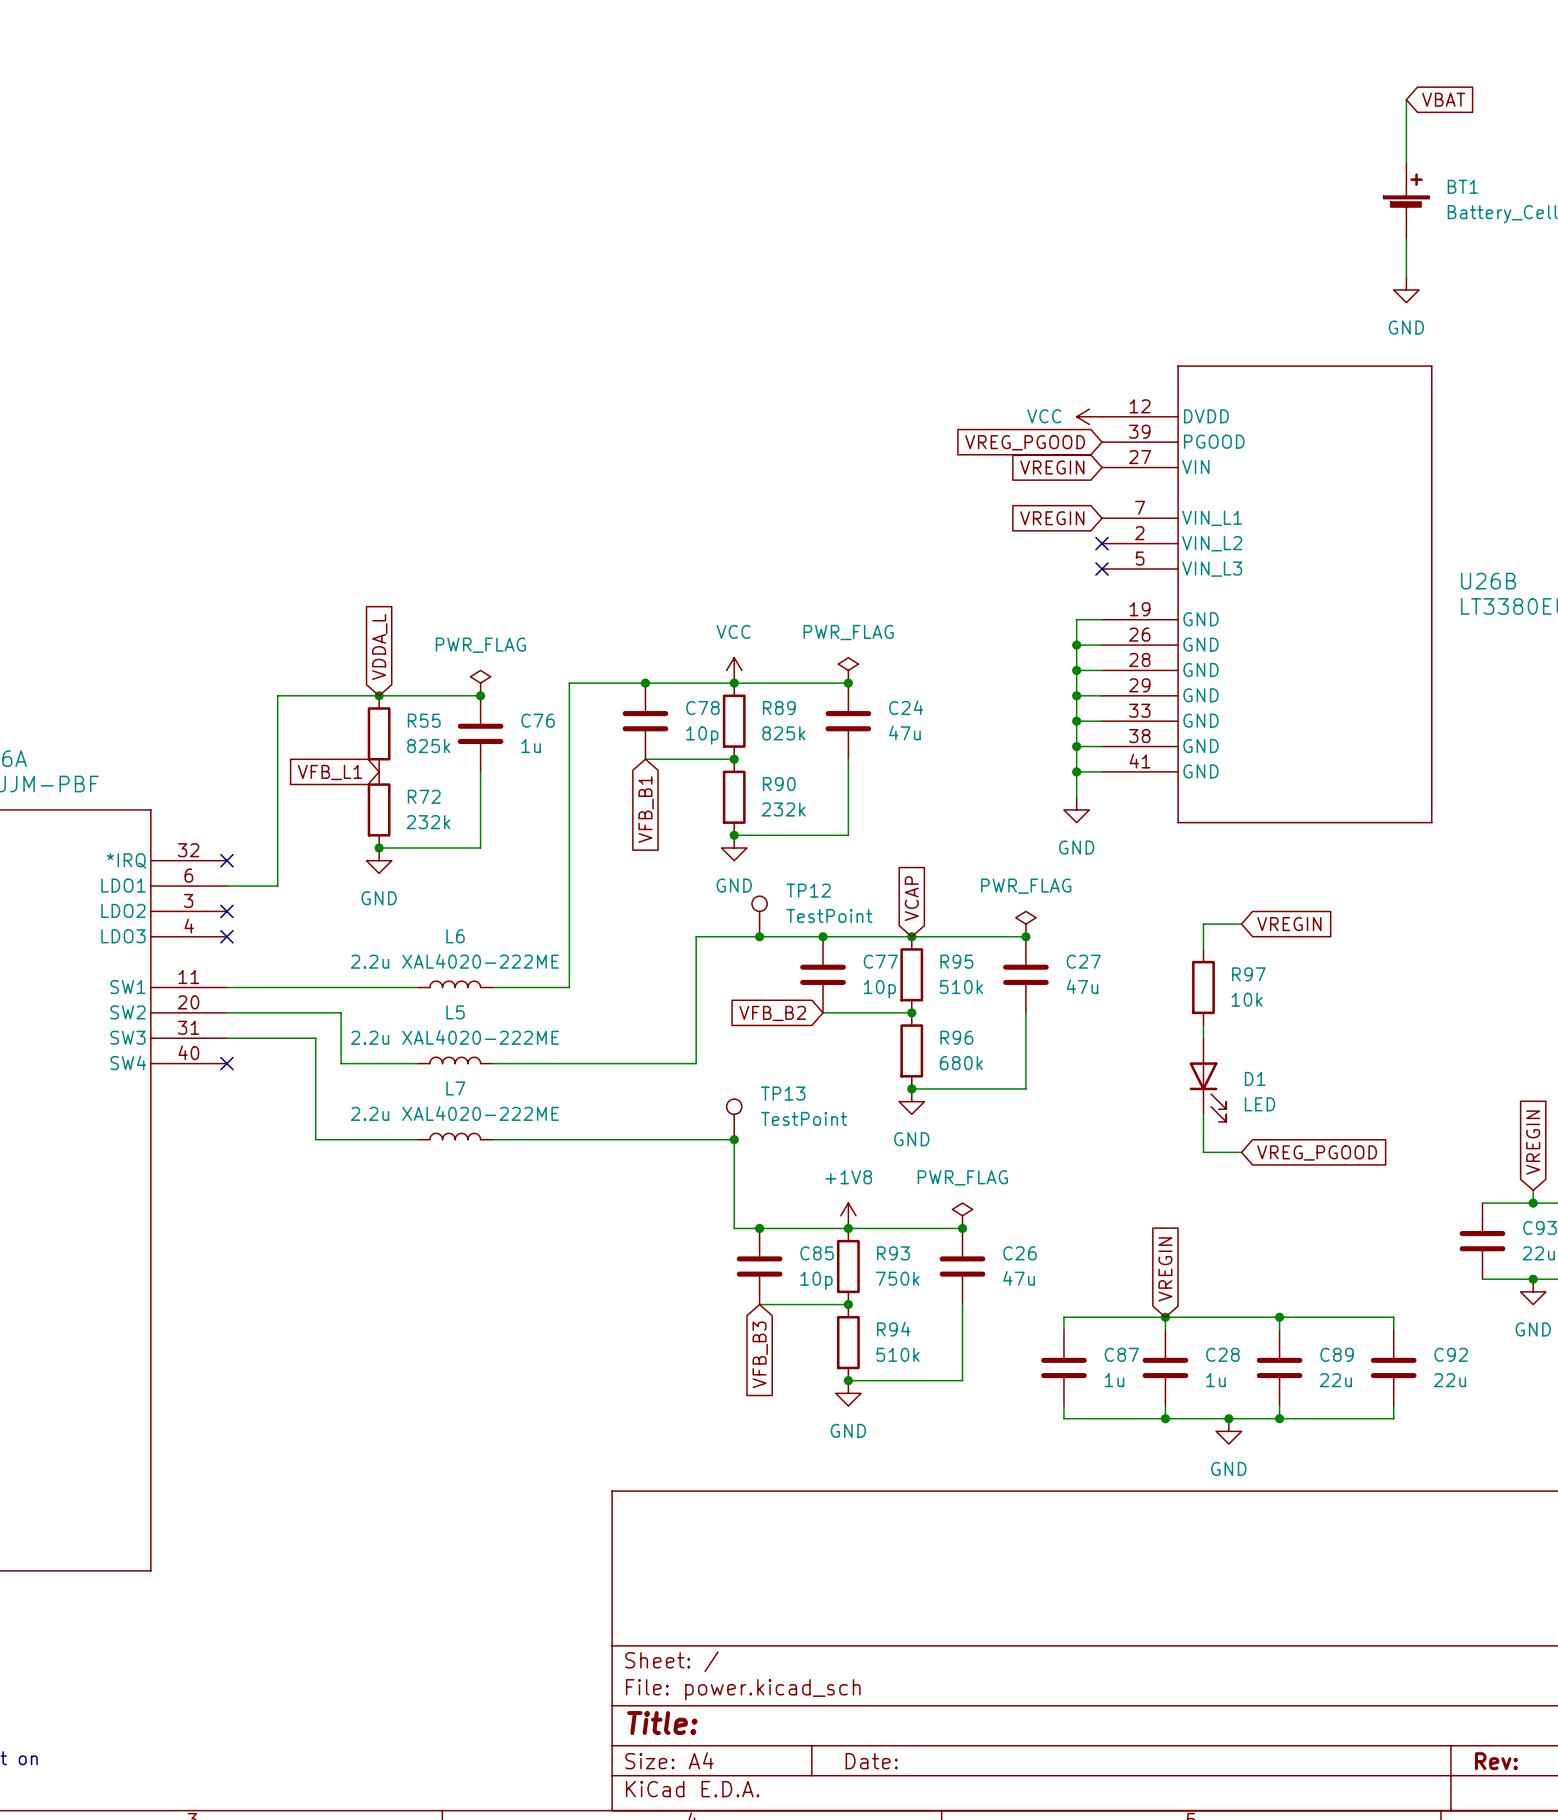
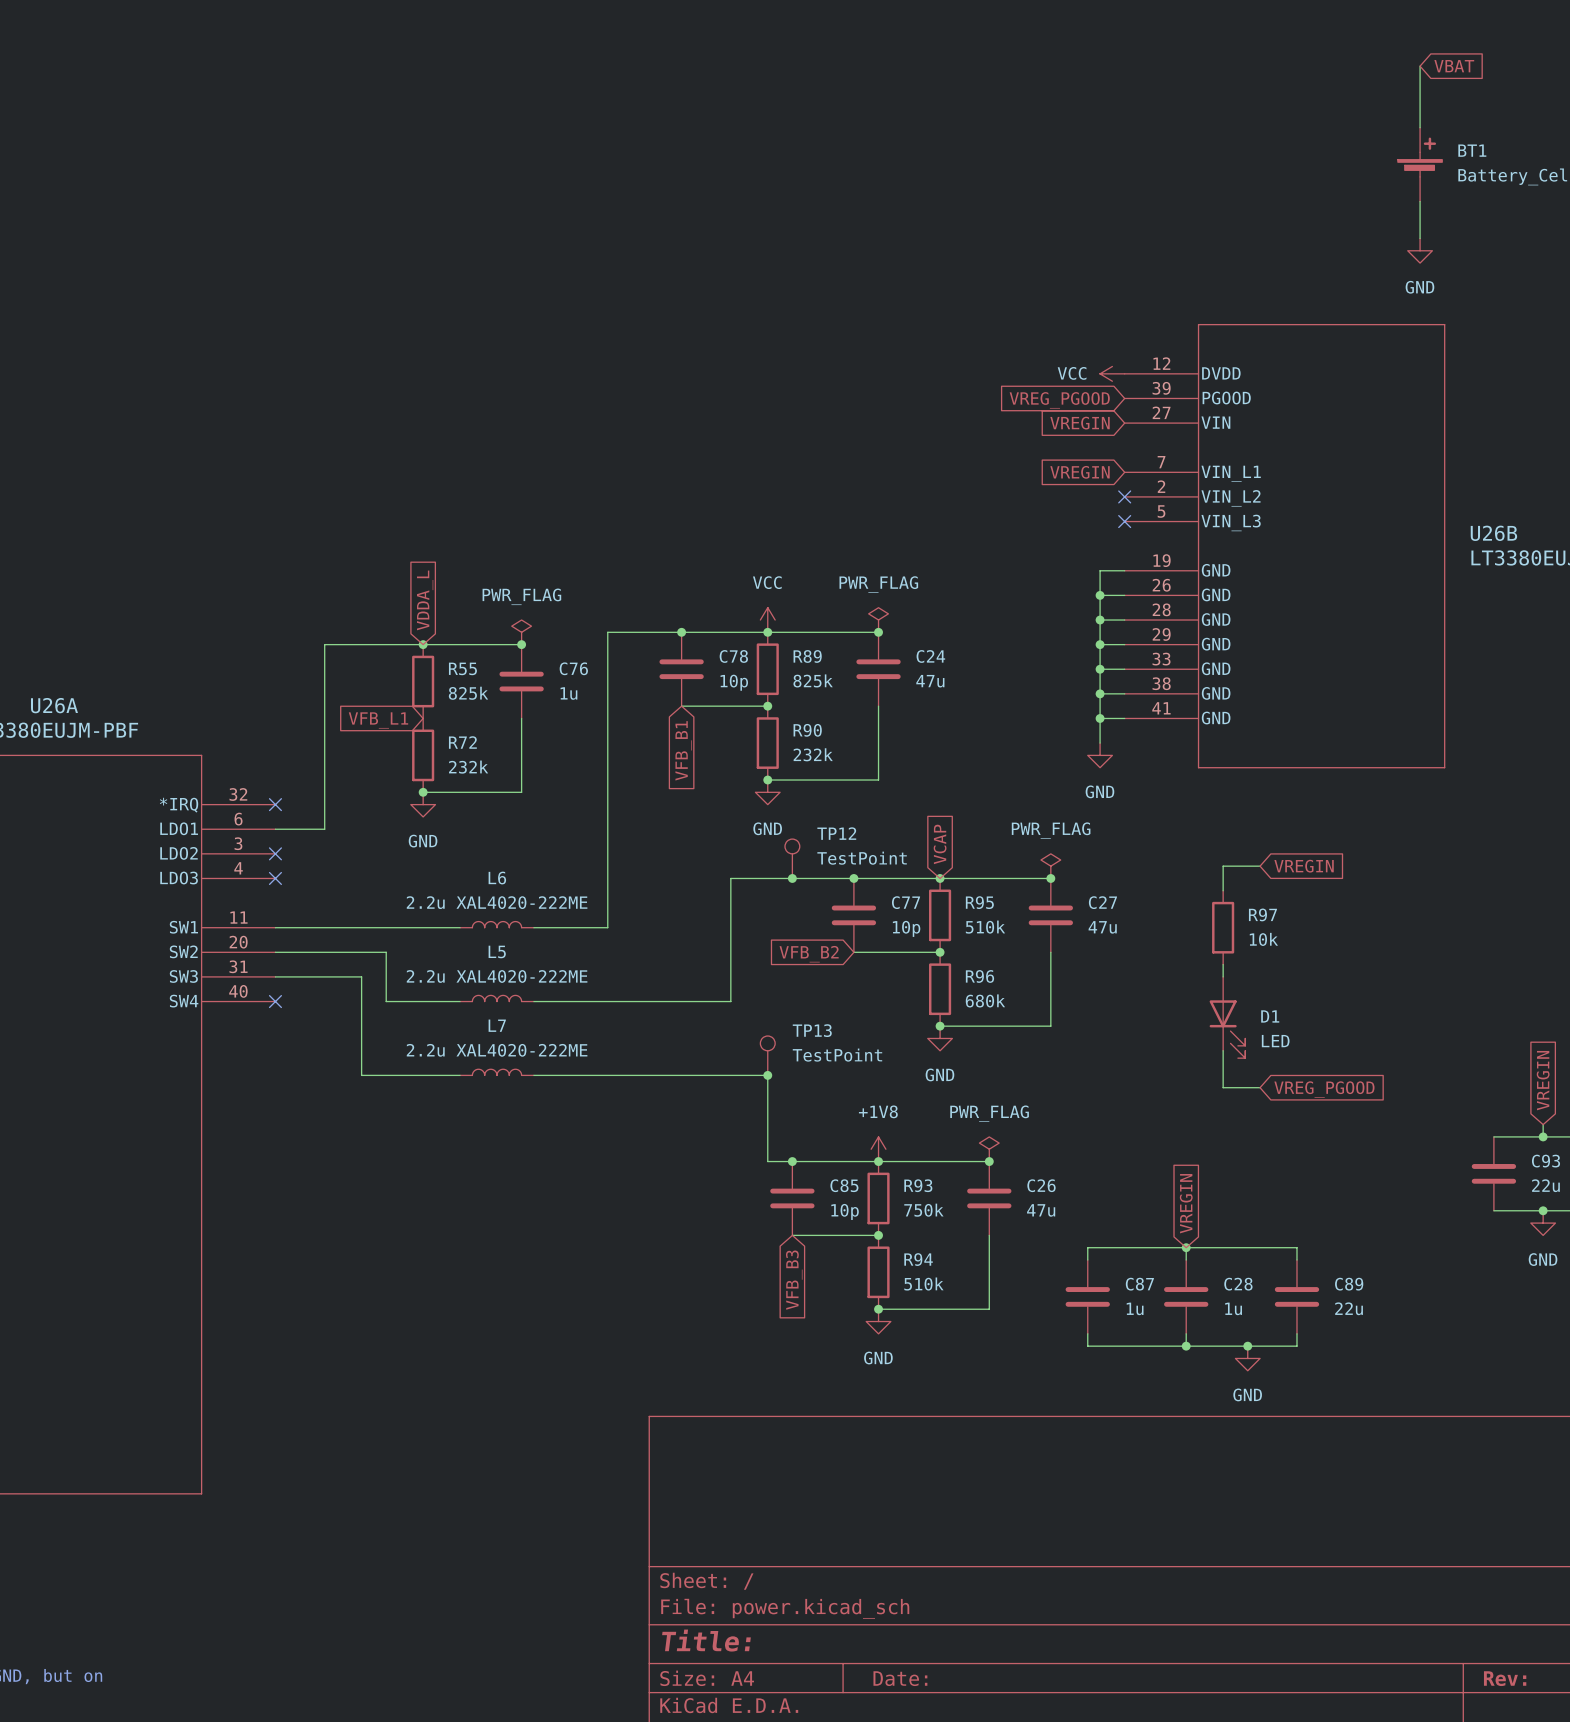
wire: (1279, 1317) (1393, 1317) (1393, 1329) -> none
junction: (1279, 1317) -> none
C92: 22u (1393, 1367) -> none
wire: (1393, 1406) (1393, 1418) (1279, 1418) -> none
junction: (1279, 1418) -> none

